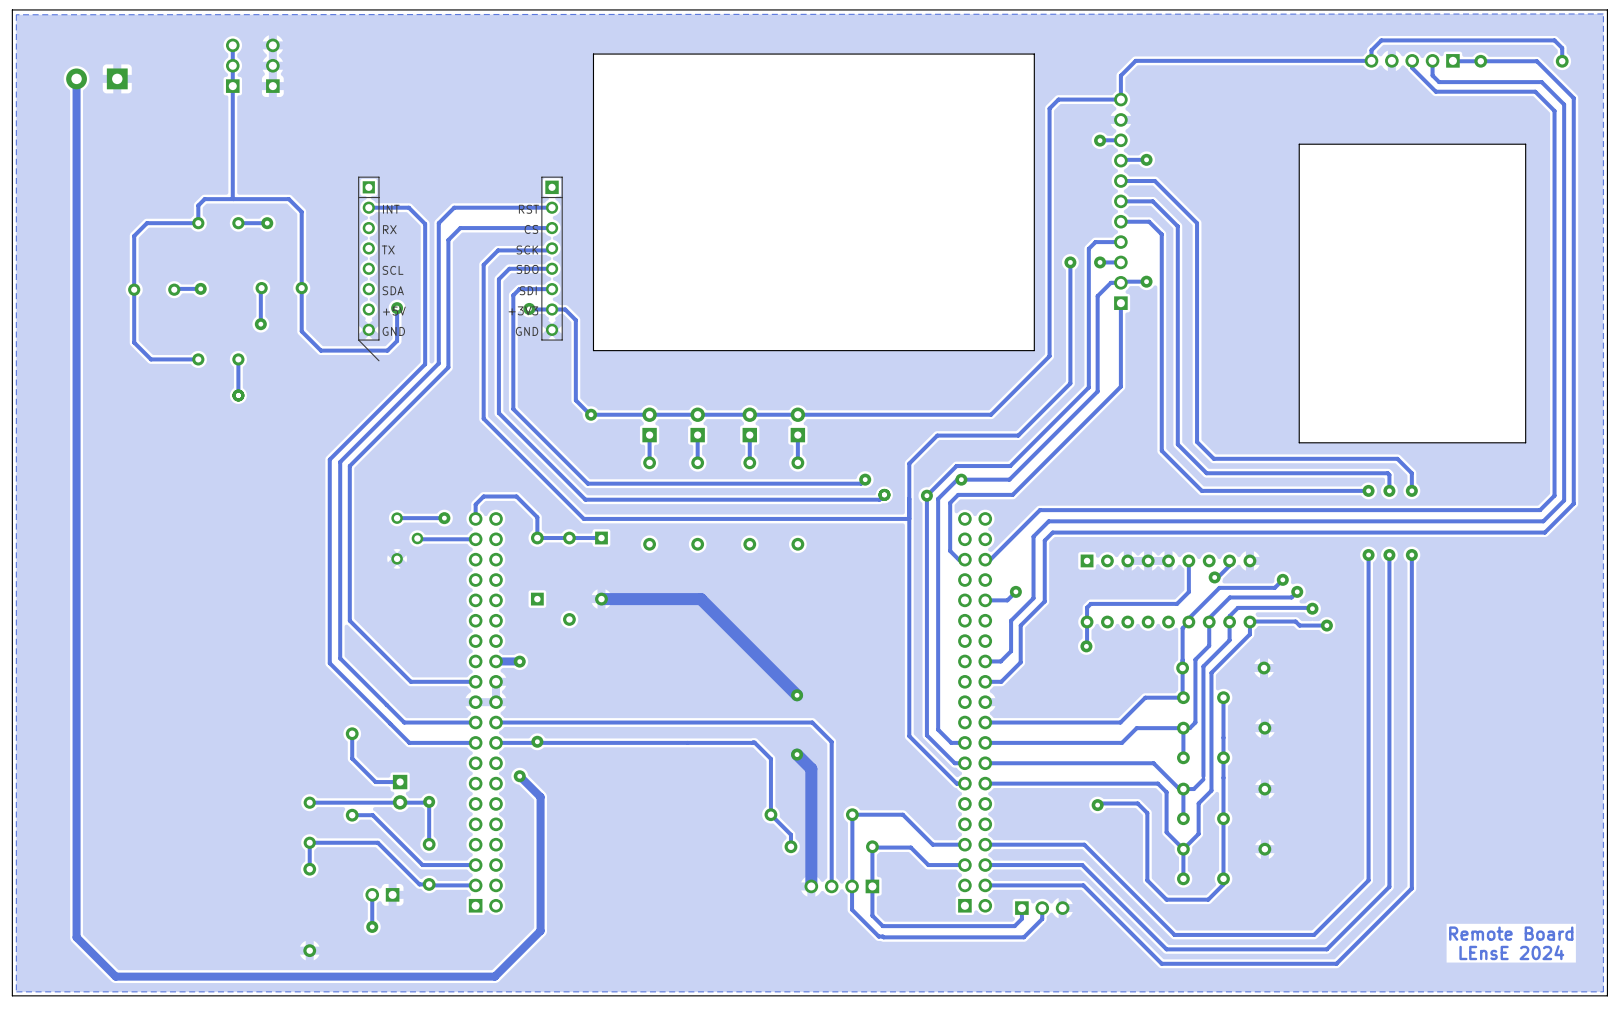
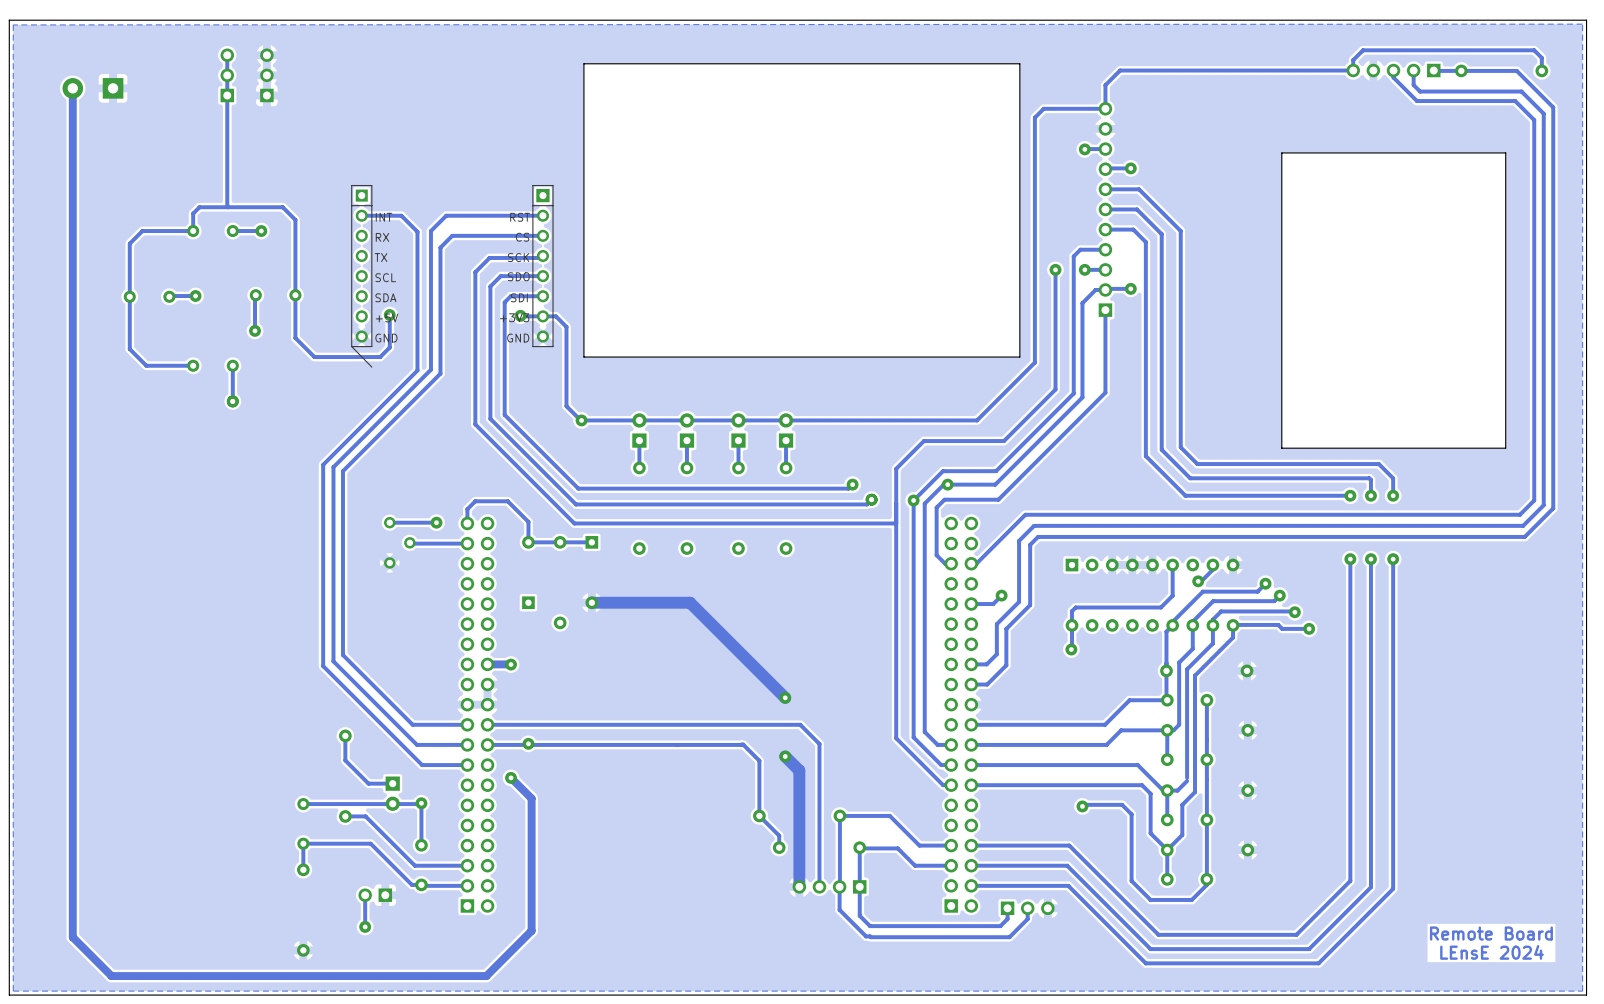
track: (349, 620) (410, 681) (475, 681) -> (342, 624) (342, 655) (412, 724)
track: (420, 722) (404, 722) -> (417, 744) (396, 724)
track: (424, 742) (409, 742) -> (467, 765) (422, 765) (401, 744)

